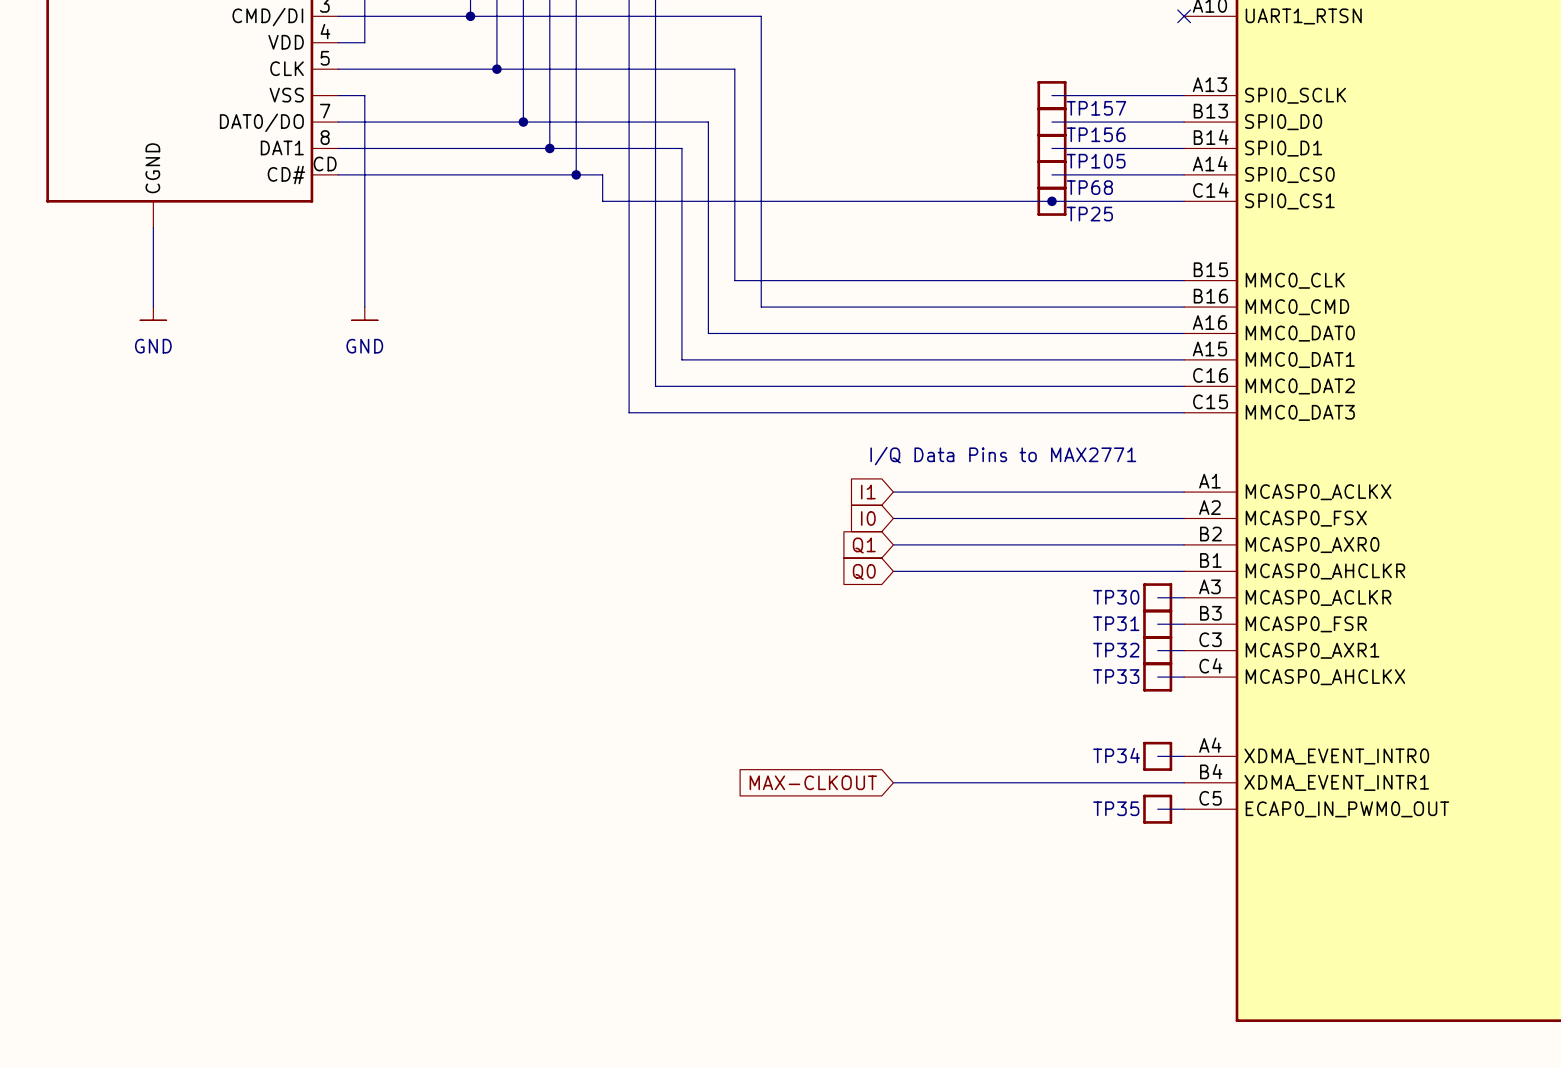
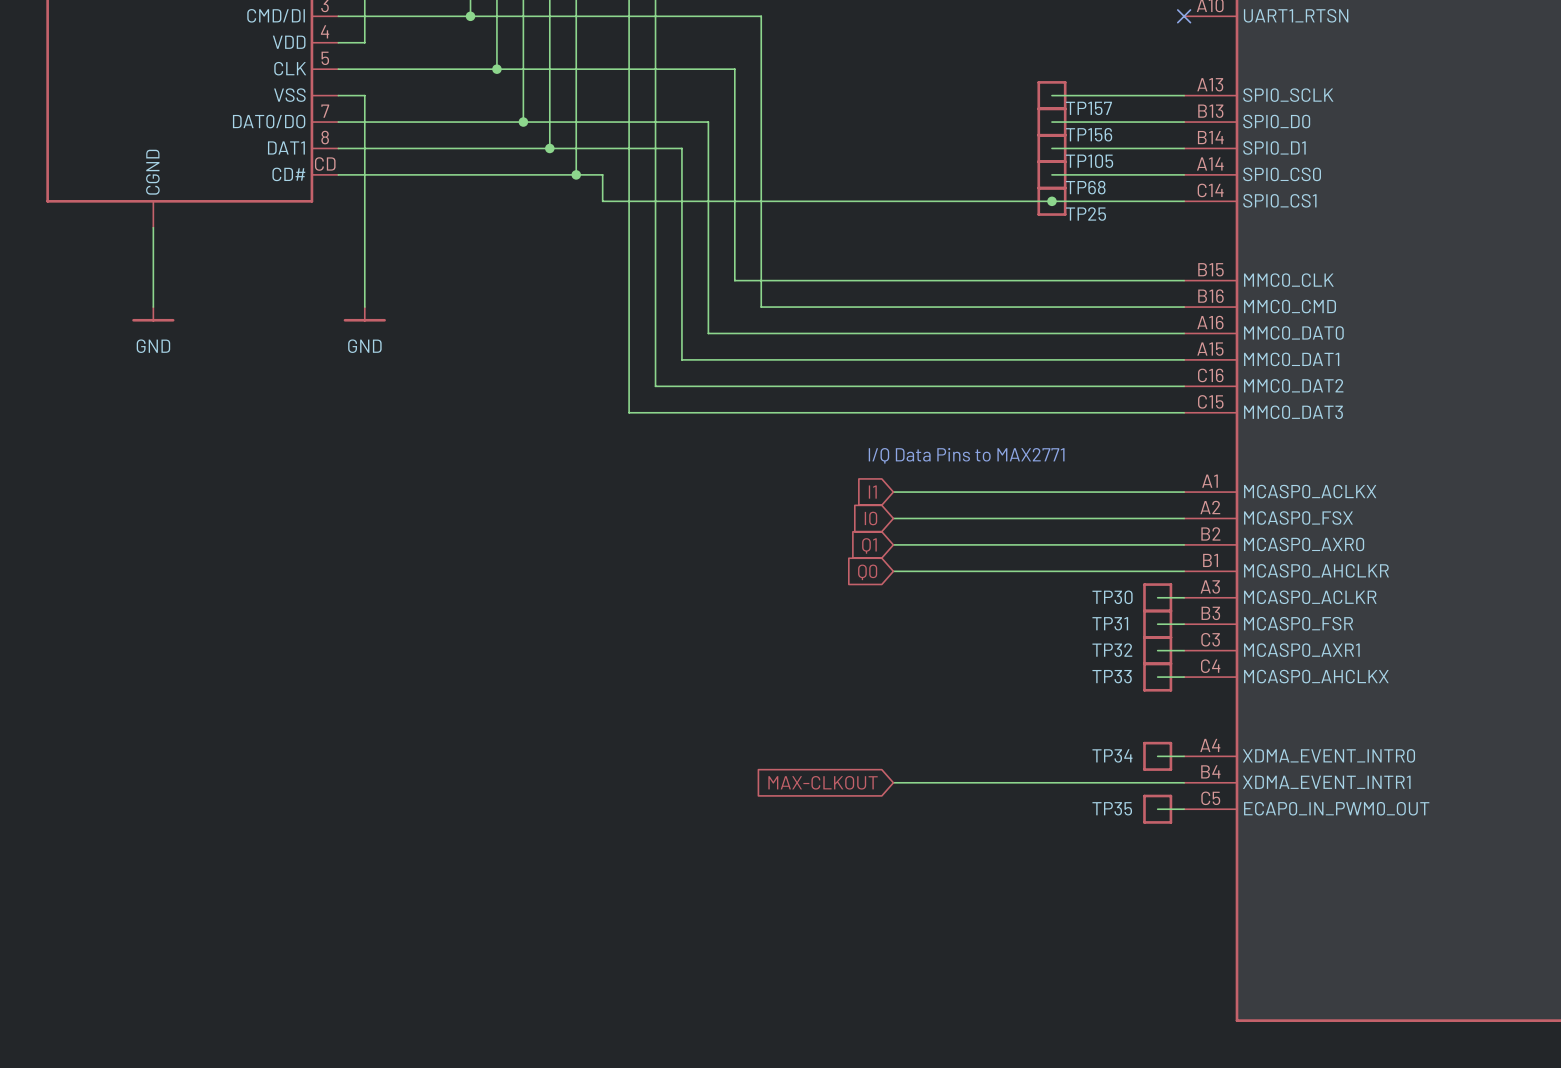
power symbol shape: [140, 307, 167, 321] -> [132, 307, 175, 322]
power symbol shape: [351, 307, 379, 321] -> [343, 307, 386, 322]

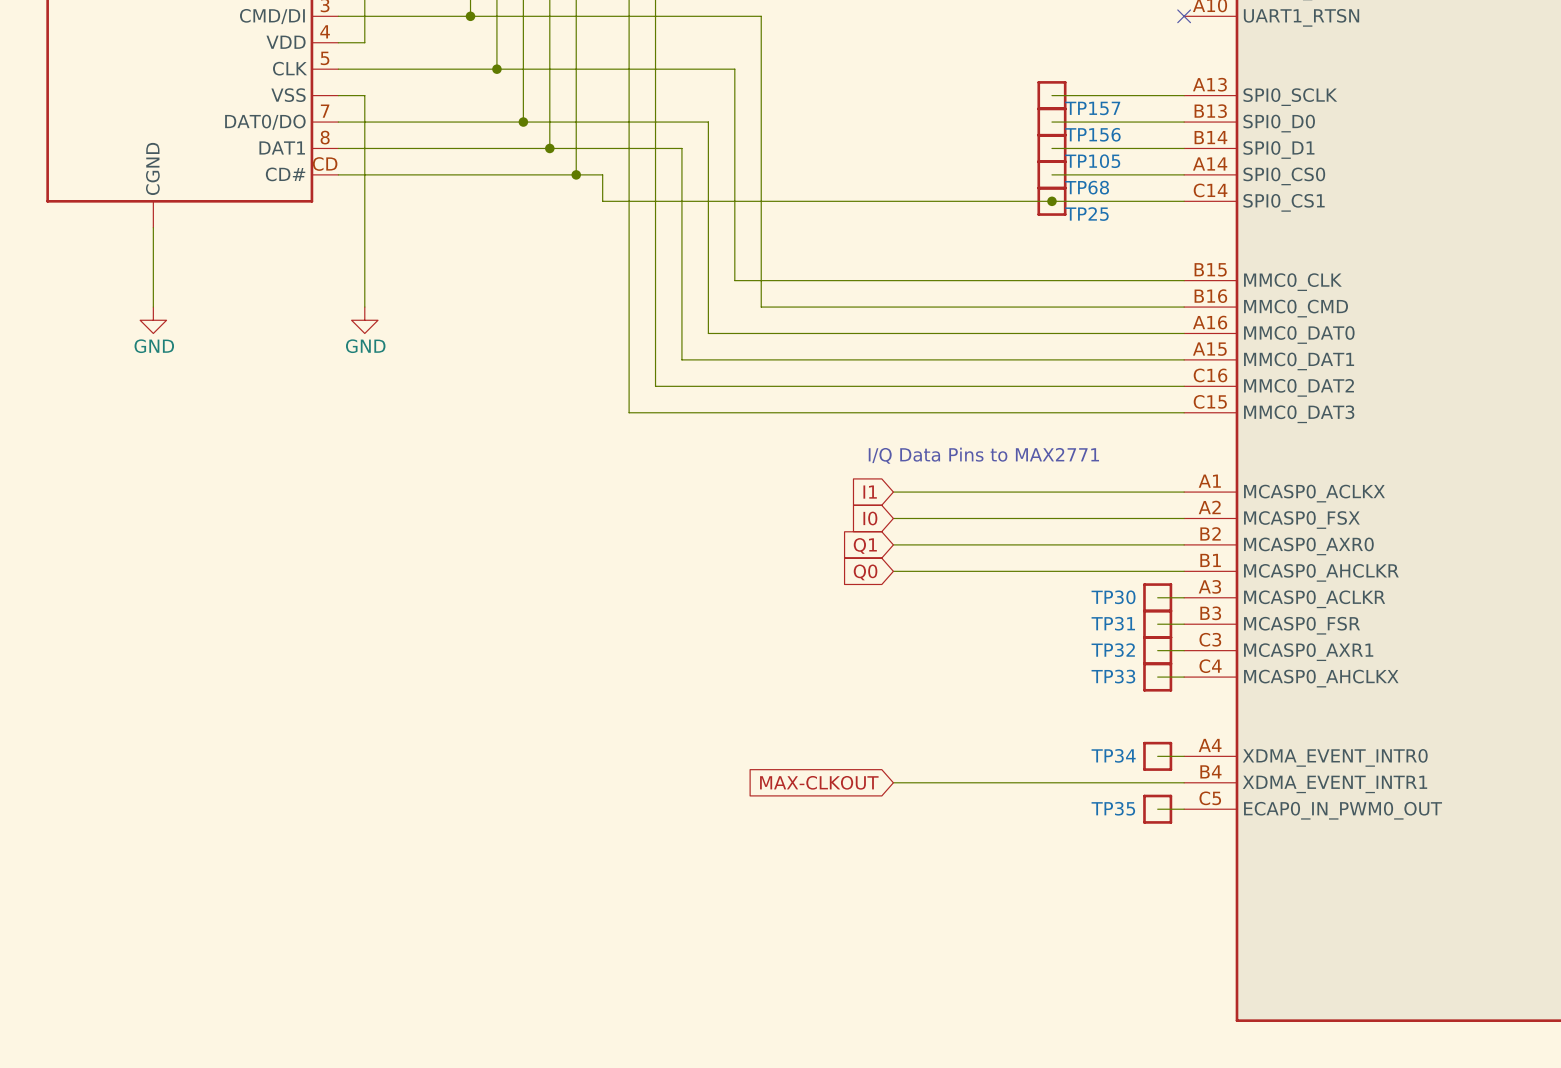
power symbol shape: [132, 307, 175, 322] -> [140, 307, 167, 334]
power symbol shape: [343, 307, 386, 322] -> [351, 307, 379, 334]

